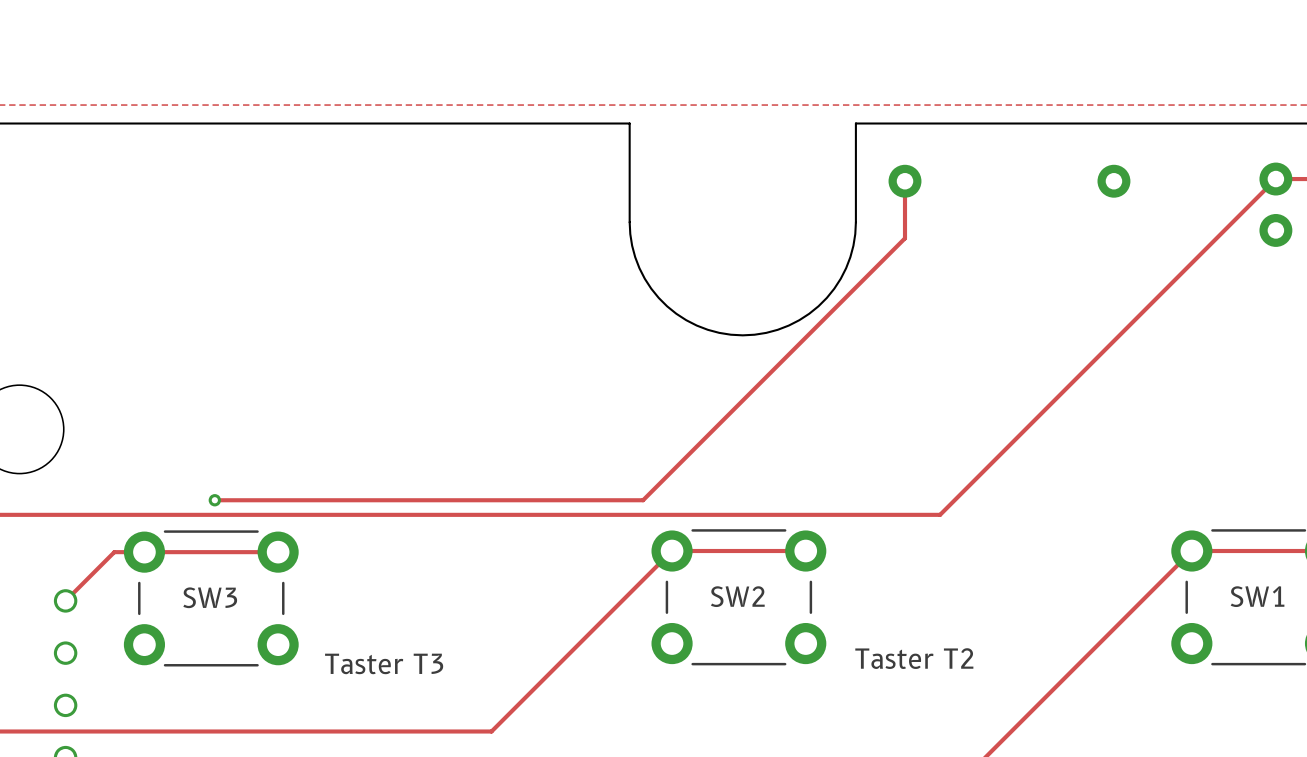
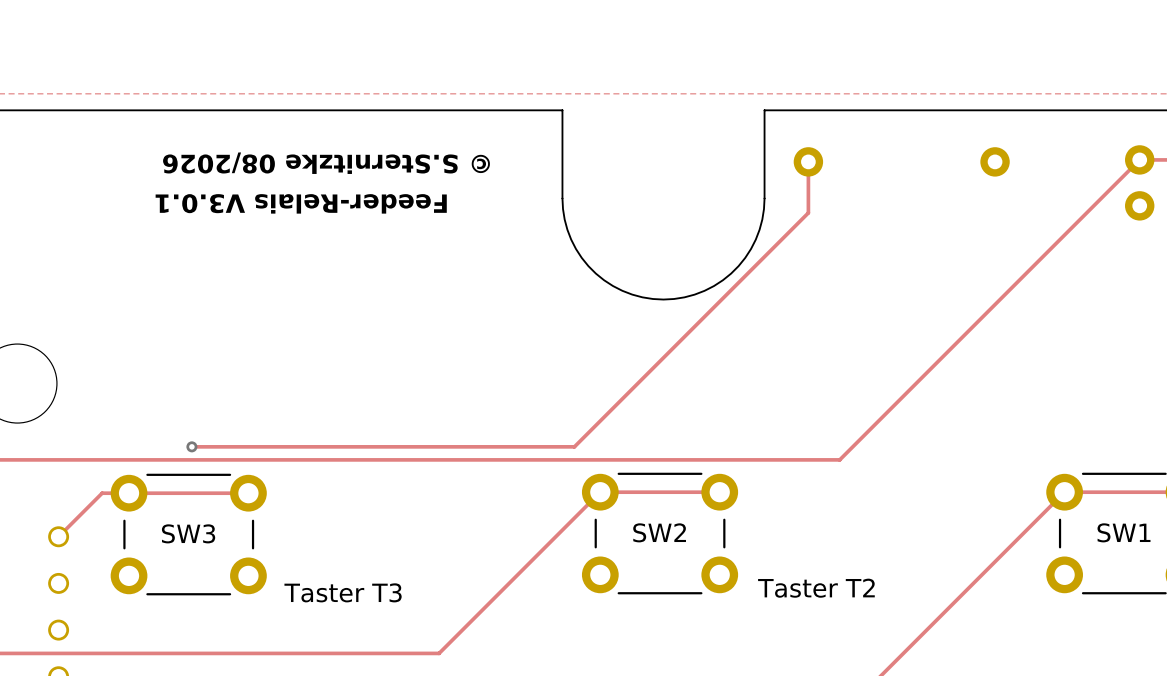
text: none -> © S.Sternitzke 08/2026 (326, 163)
text: none -> Feeder-Relais V3.0.1 (301, 203)

